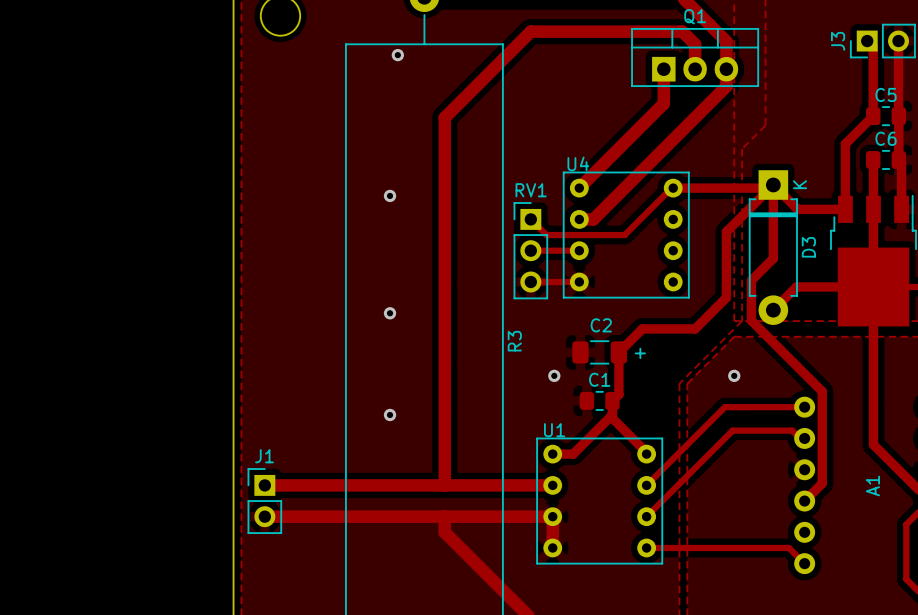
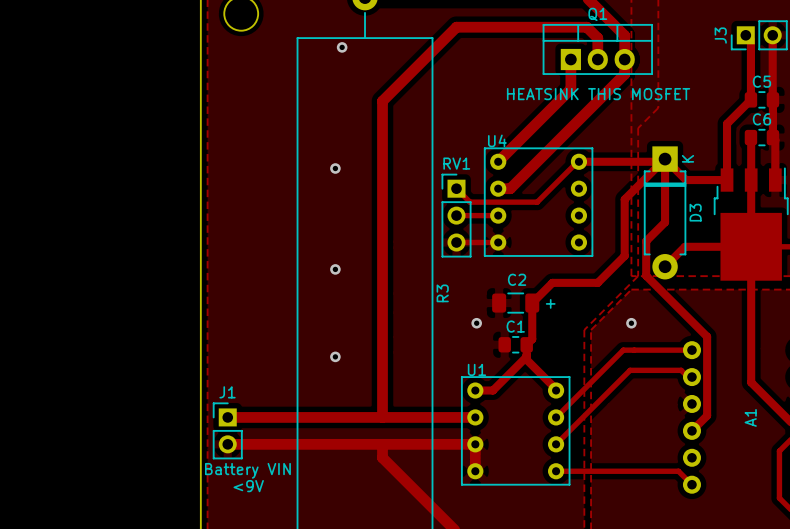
text: none -> HEATSINK THIS MOSFET (598, 94)
text: none -> Battery VIN (247, 470)
text: none -> <9V (248, 486)

